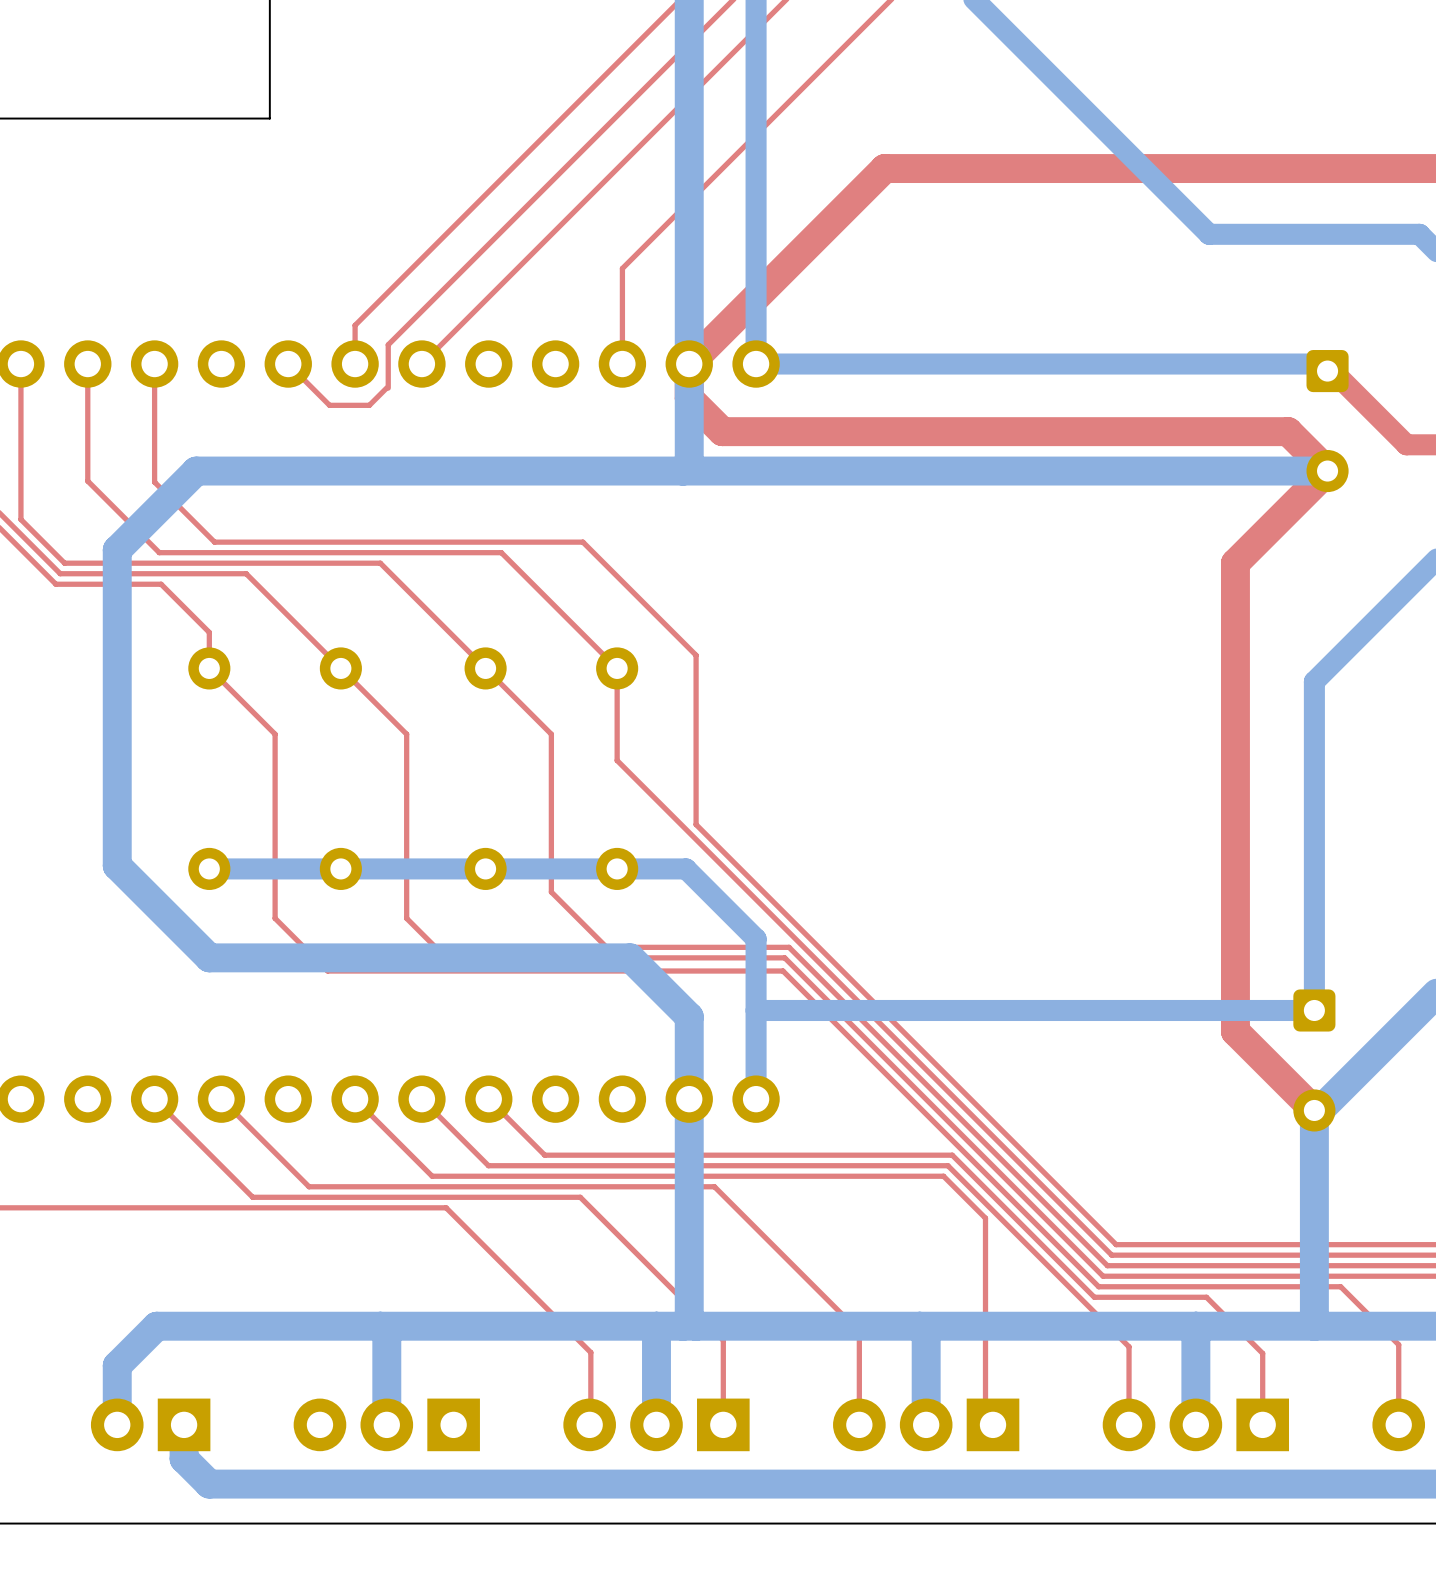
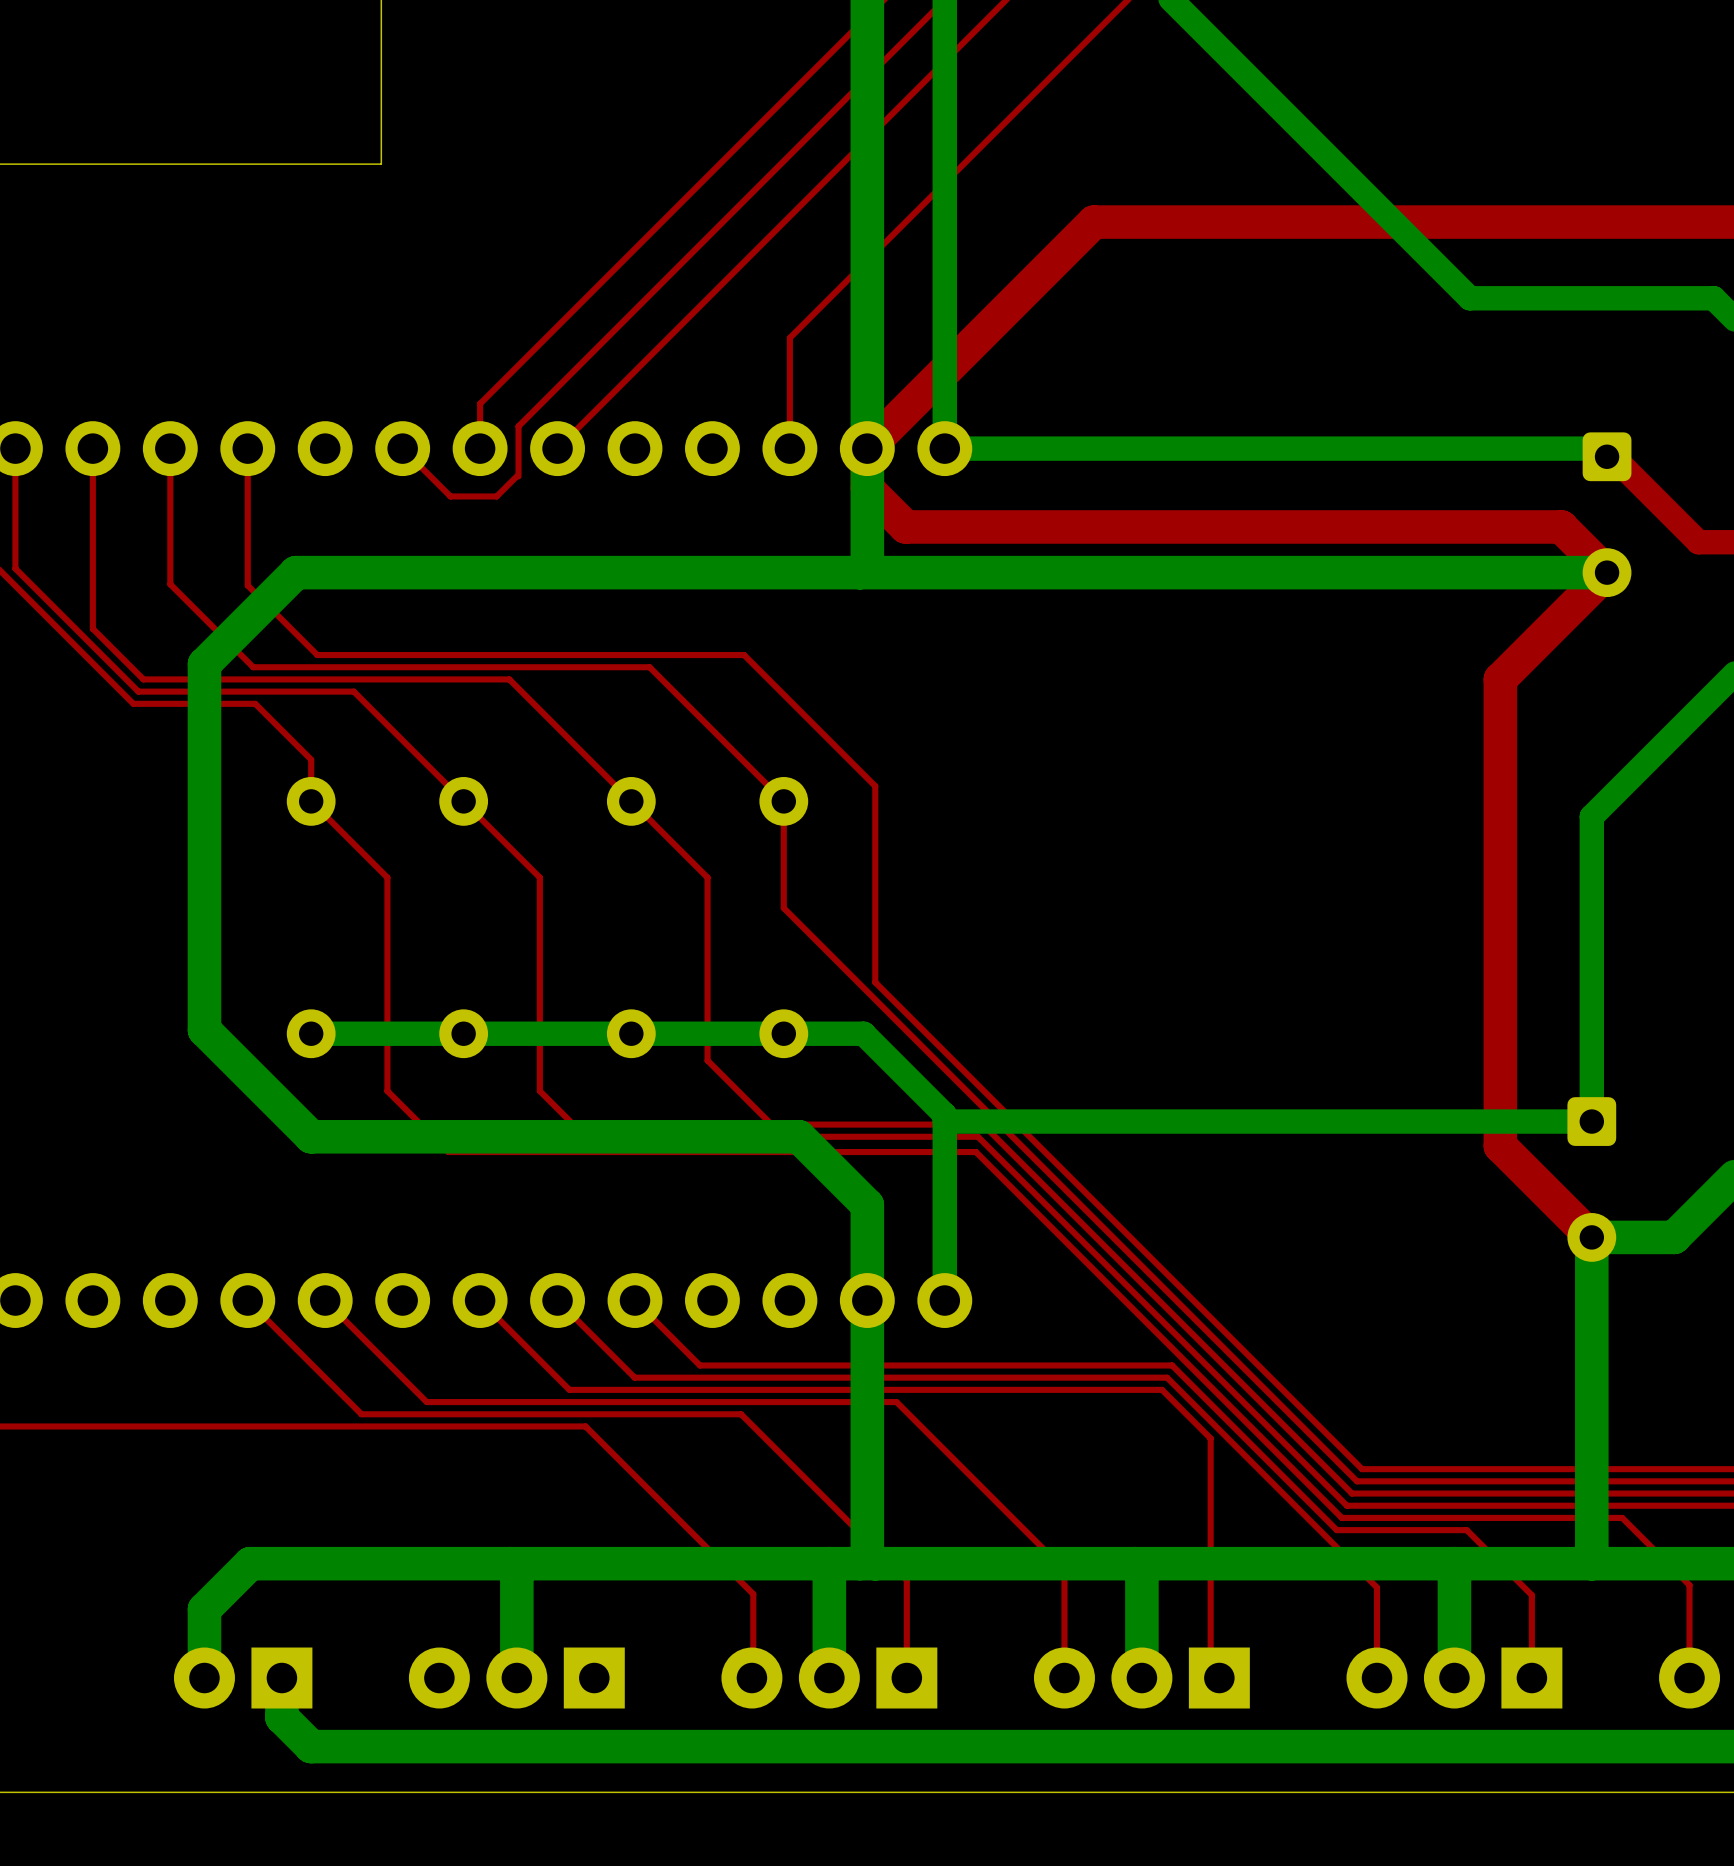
bottom track: (1314, 944) (1314, 1010) (756, 1010) -> (1591, 1121) (944, 1121)
top track: (1235, 965) (1235, 1031) (1314, 1110) -> (1500, 1145) (1591, 1237)
bottom track: (1385, 1044) (1314, 1115) -> (1674, 1237) (1591, 1237) (1591, 1319)
part position: (1314, 1060) -> (1591, 1179)

